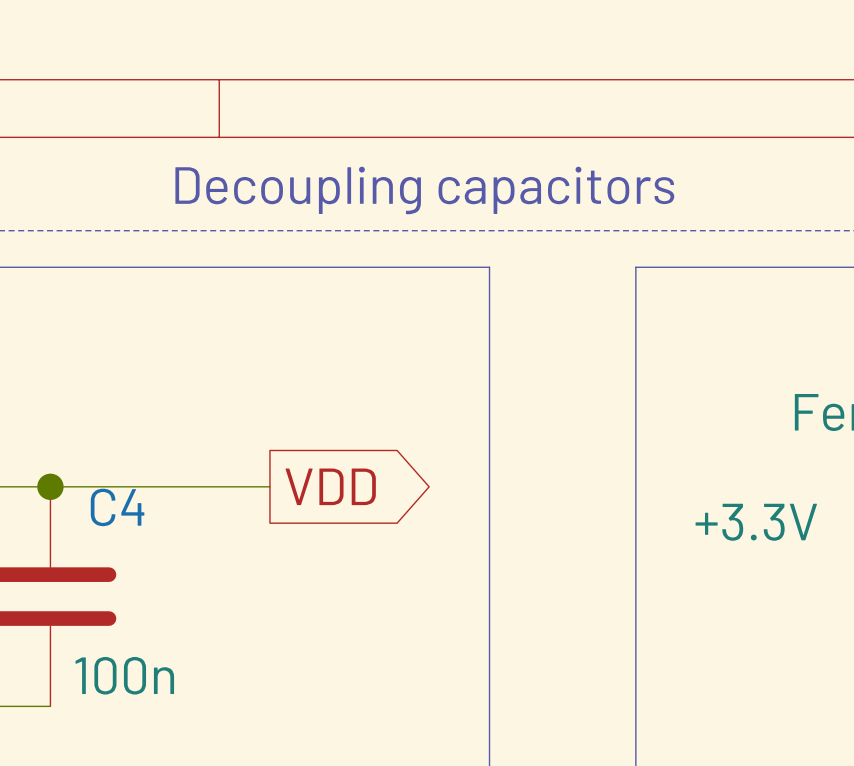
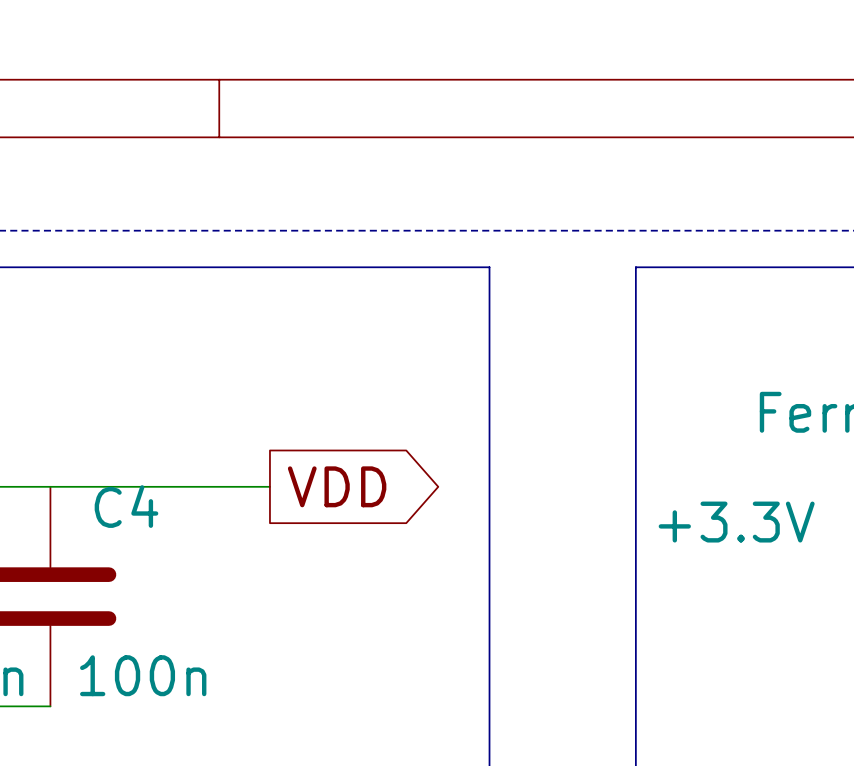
text: Decoupling capacitors (424, 190) -> none
junction: (50, 486) -> none

